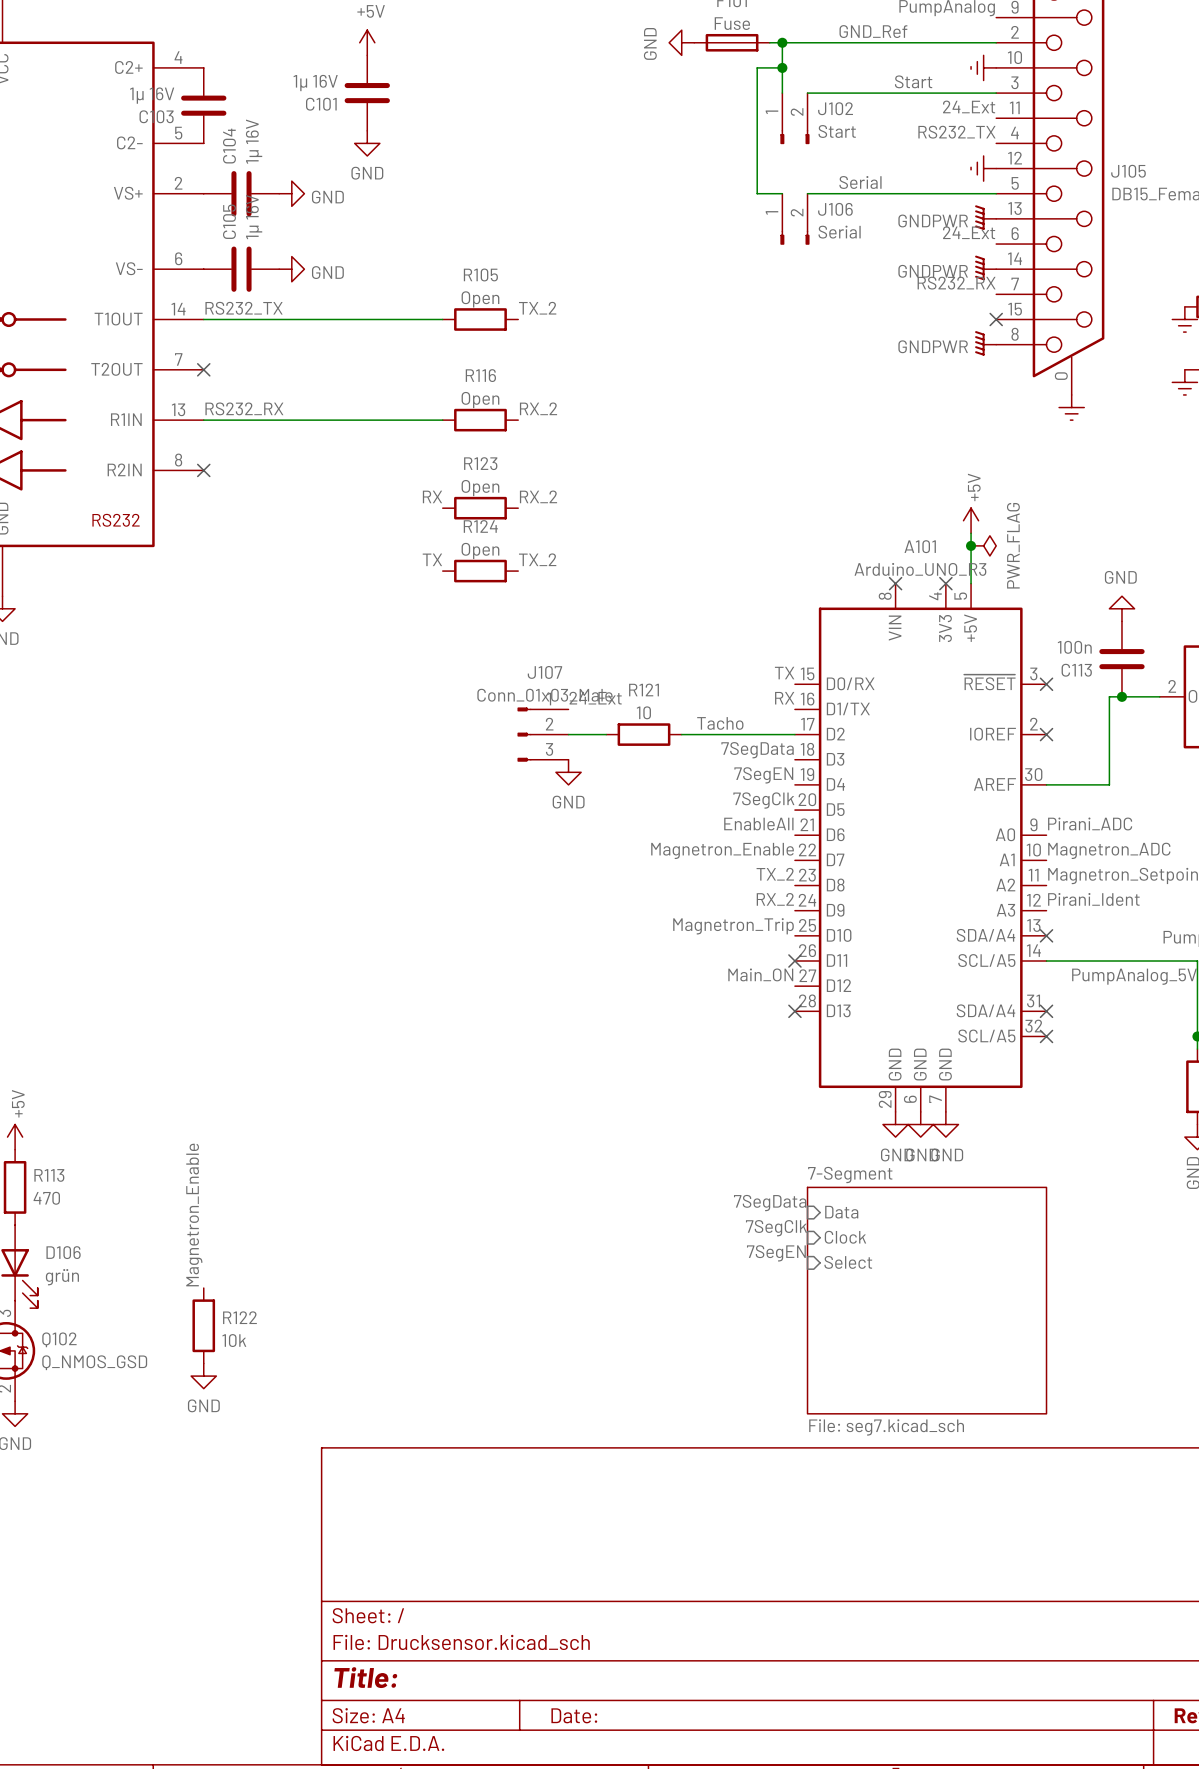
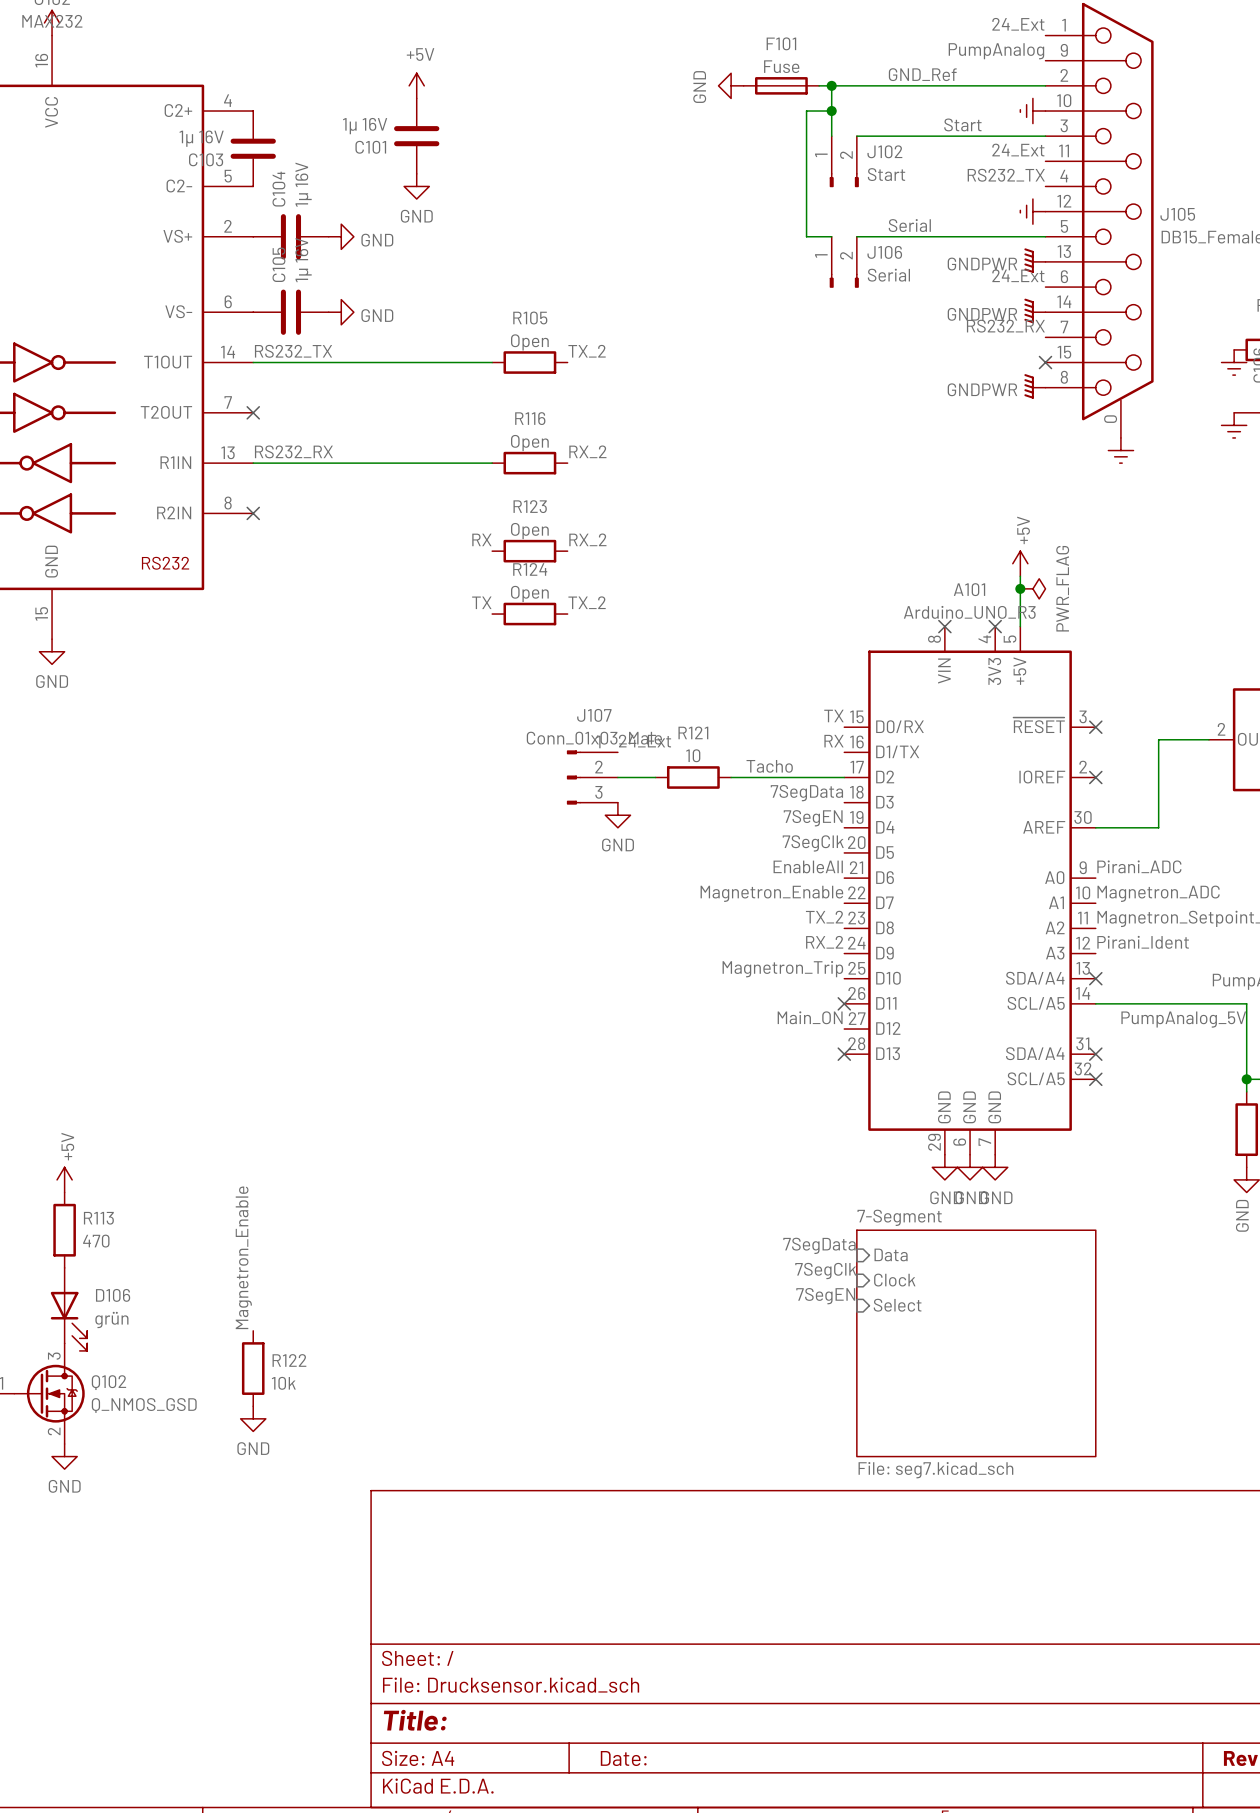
power symbol: GND (1121, 608) -> none
C113: 100n (1121, 659) -> none
junction: (1121, 696) -> none

